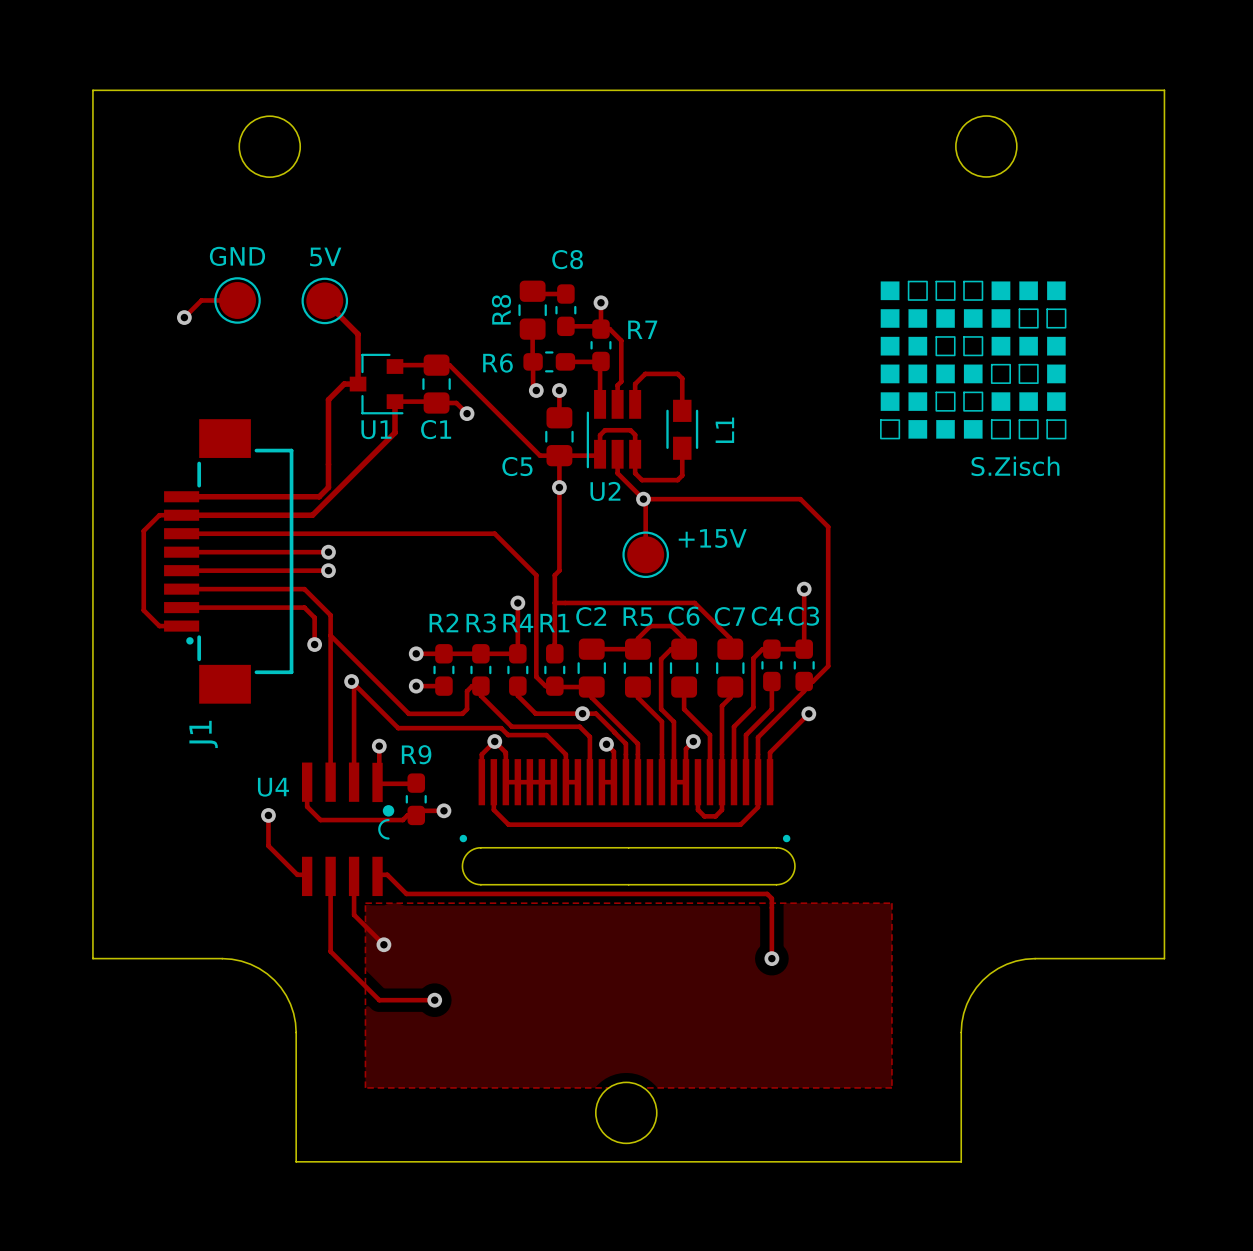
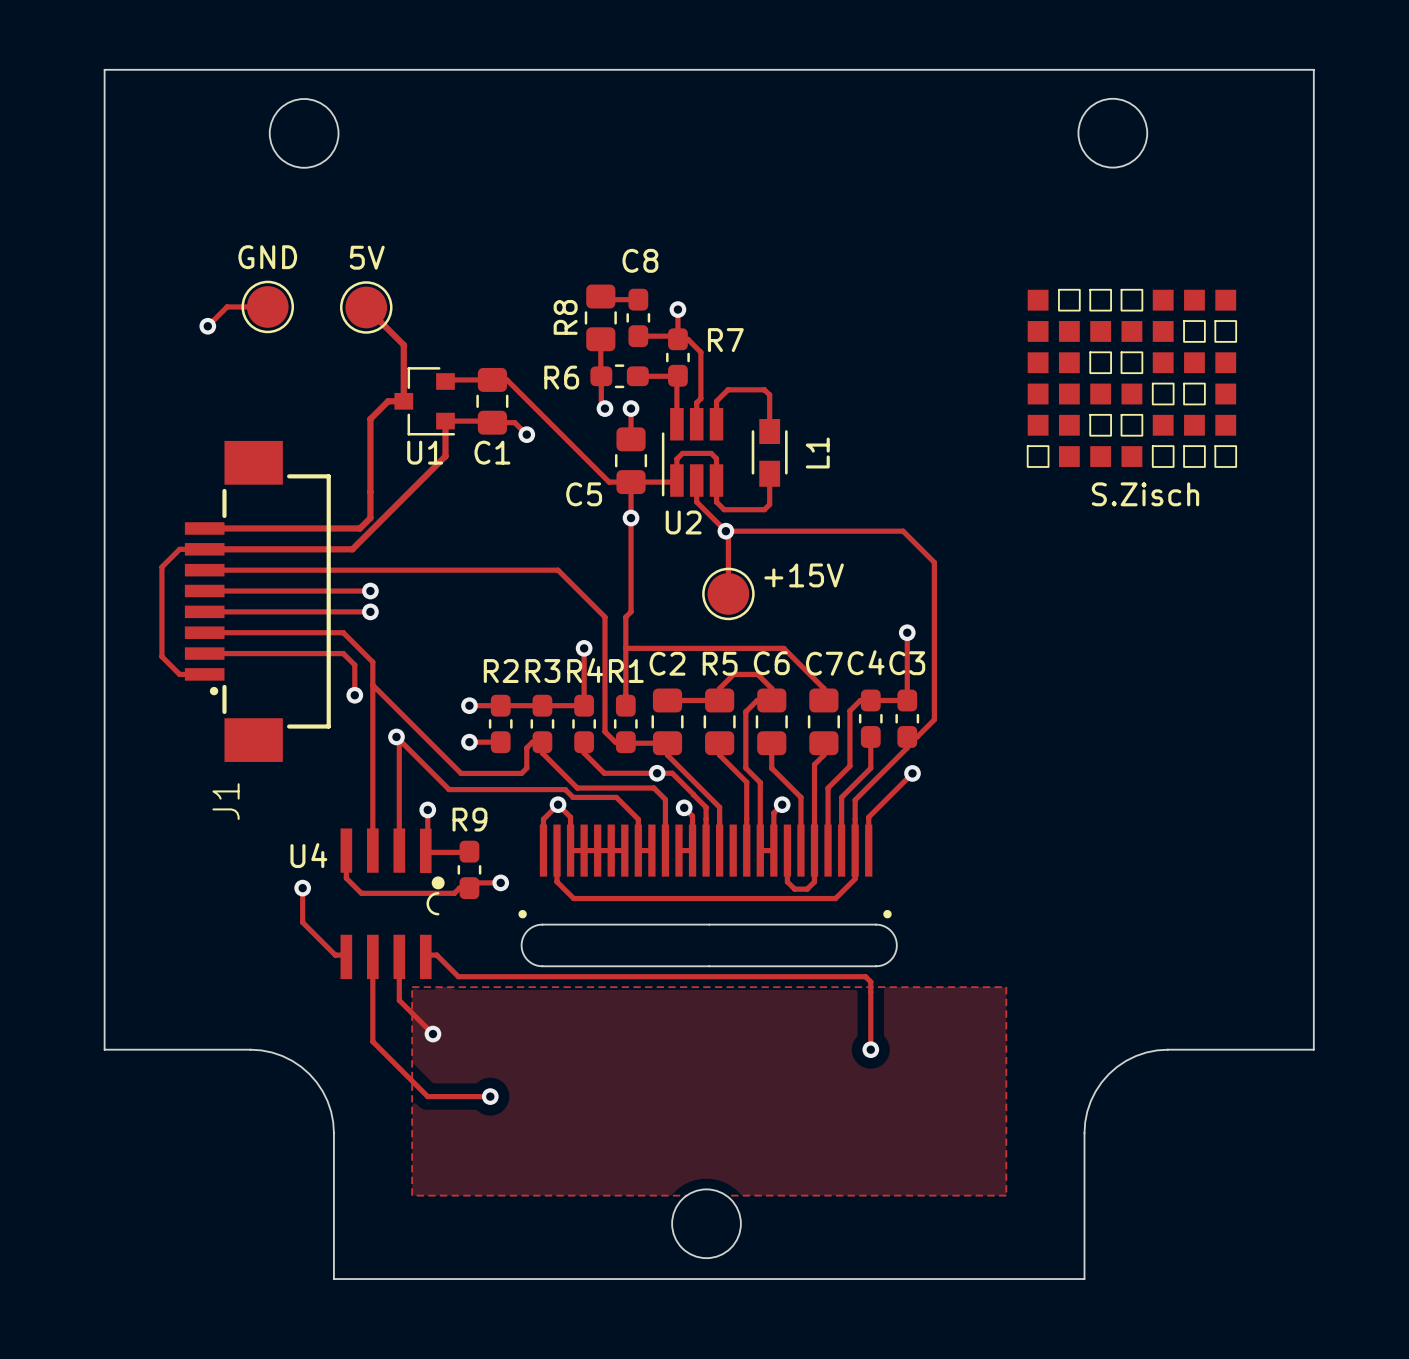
drawing: [880, 281, 1067, 440] -> none
part: none -> (1131, 378)

